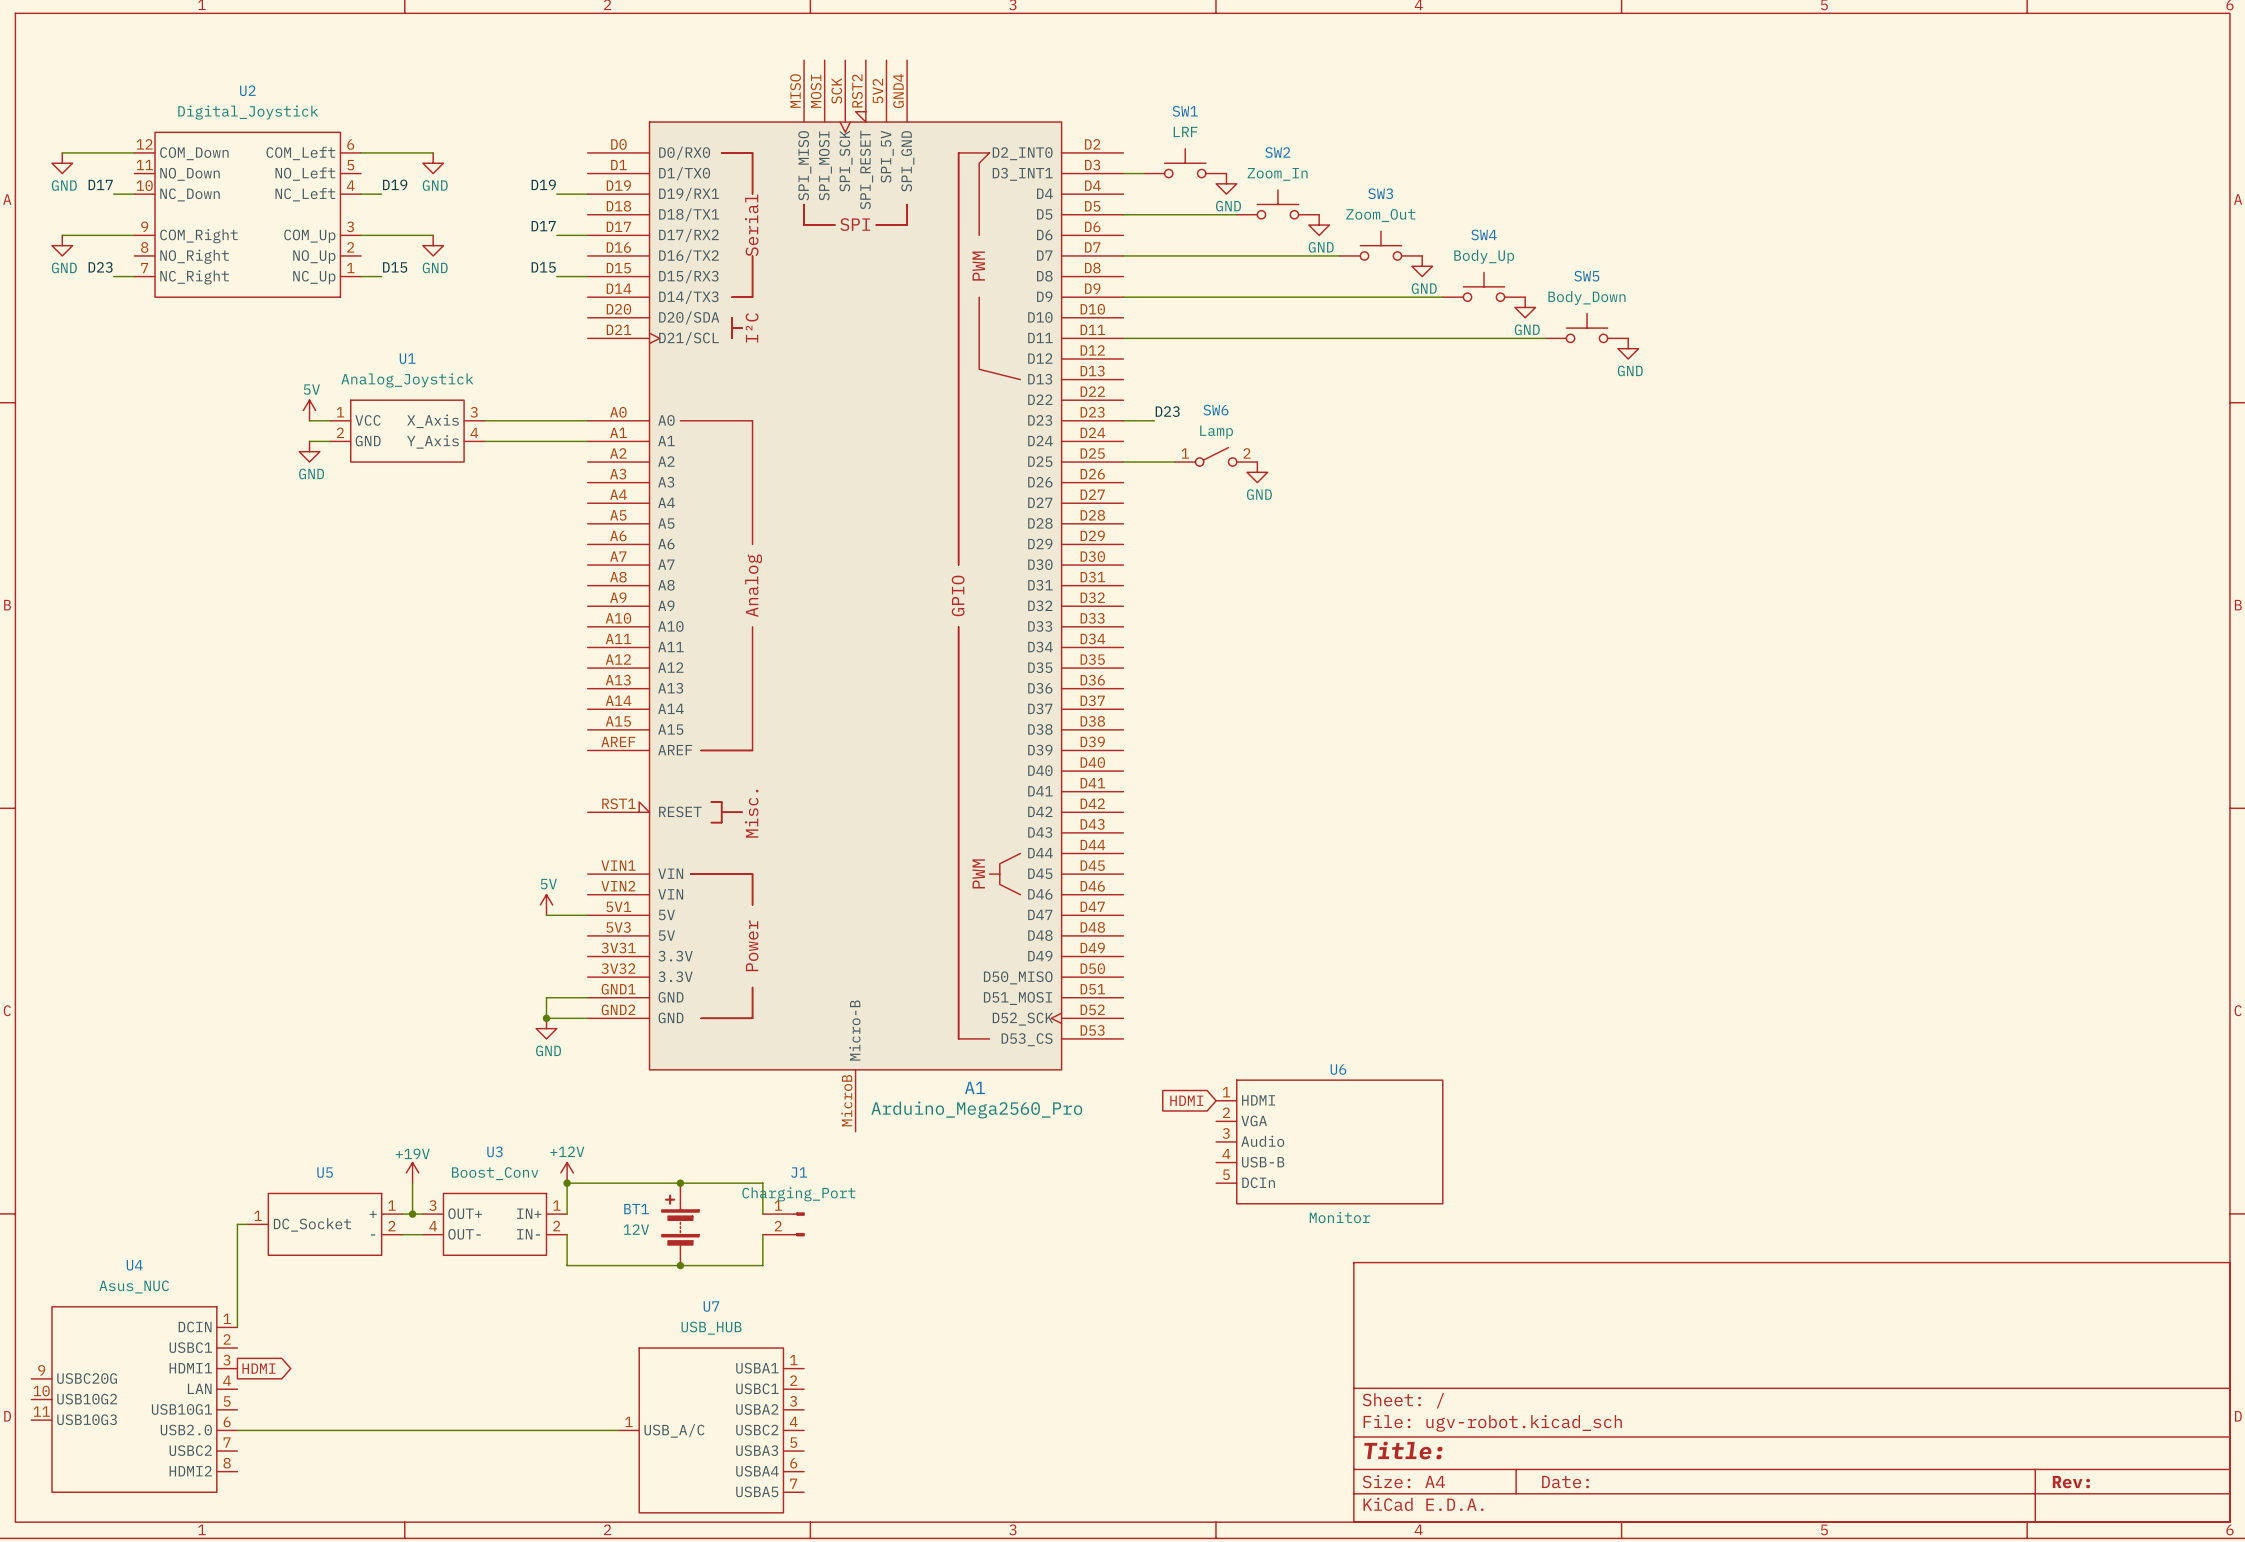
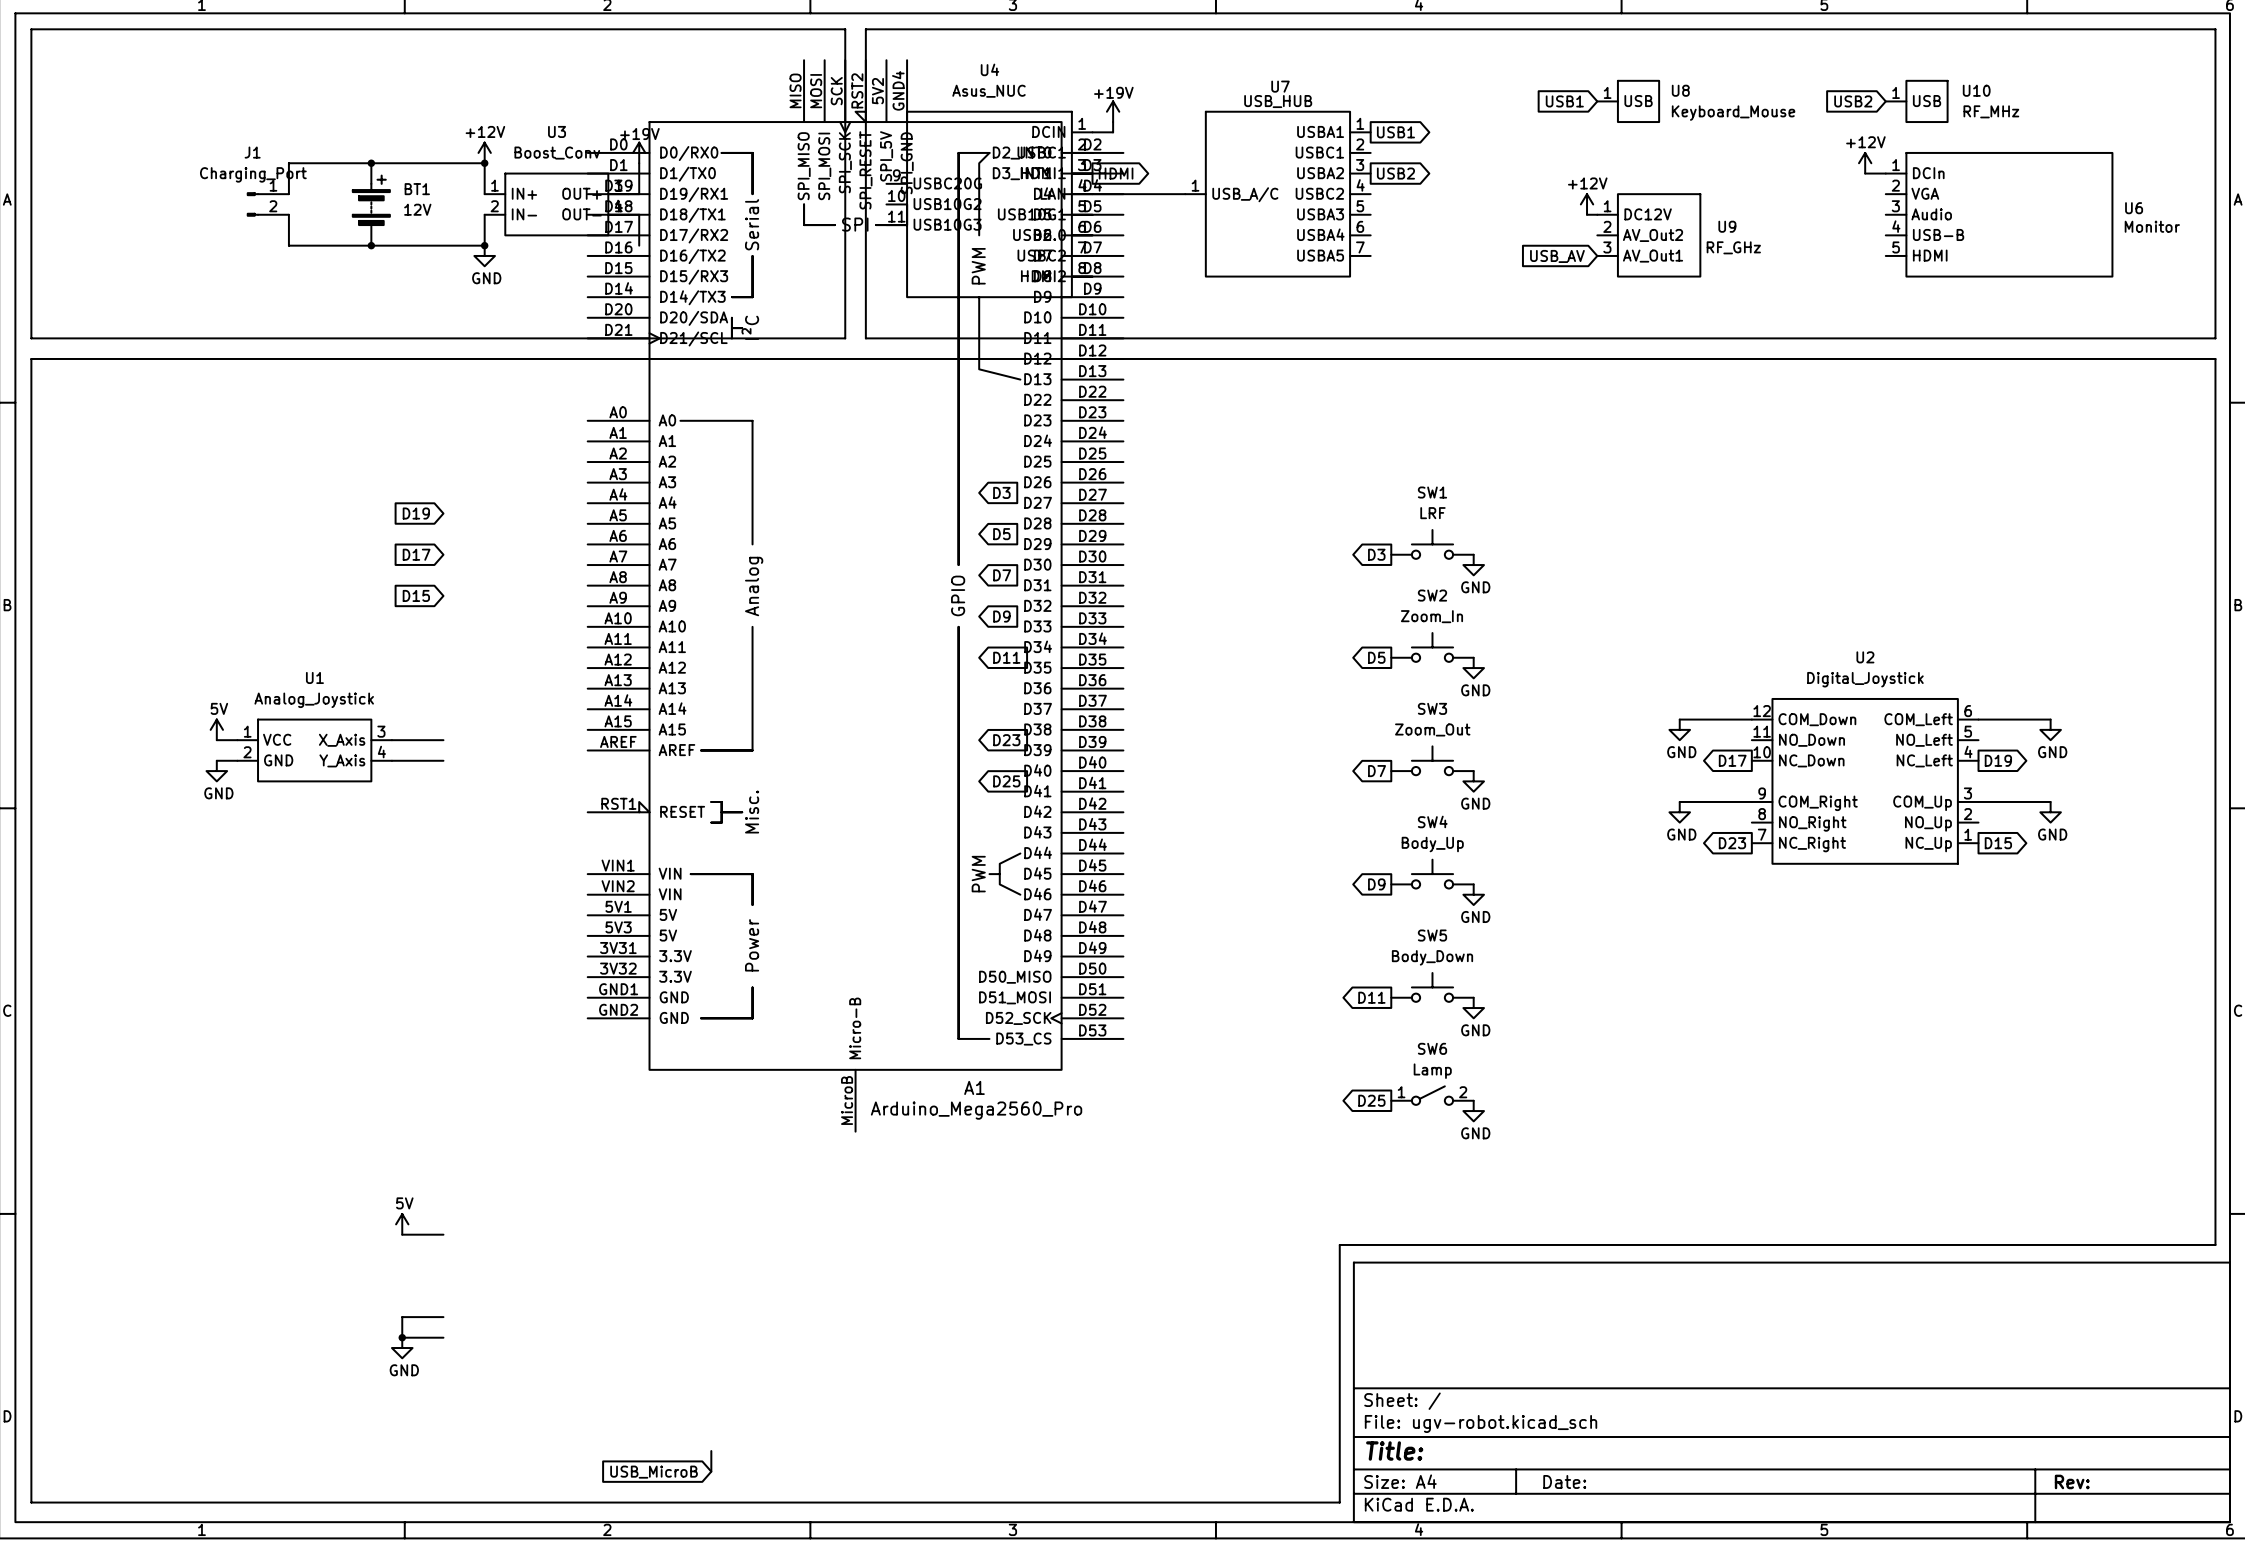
line: none -> (31, 29) (845, 29) (845, 338) (31, 338) (31, 29)
line: none -> (865, 29) (2215, 29) (2215, 338) (865, 338) (865, 29)
global label: none -> USB1 (1564, 101)
U8: none -> Keyboard_Mouse (1628, 101)
global label: none -> USB2 (1853, 101)
U10: none -> RF_MHz (1916, 101)
power symbol: none -> +19V (1113, 111)
wire: none -> (1113, 122) (1113, 132) (1092, 132)
global label: none -> USB1 (1395, 132)
wire: (62, 152) (134, 152) -> none
wire: (361, 152) (433, 152) -> none
power symbol: none -> +12V (484, 152)
power symbol: none -> +19V (639, 152)
power symbol: GND (62, 163) -> none
junction: none -> (371, 163)
power symbol: GND (433, 163) -> none
junction: none -> (484, 163)
wire: none -> (639, 163) (639, 194) (628, 194)
SW1 position: (1185, 163) -> (1432, 544)
power symbol: none -> +12V (1865, 163)
global label: none -> HDMI (1116, 173)
wire: (1123, 173) (1144, 173) -> none
global label: none -> USB2 (1395, 173)
wire: none -> (1865, 173) (1885, 173)
power symbol: GND (1226, 183) -> none
label: D17 (100, 184) -> none
label: D19 (395, 184) -> none
label: D19 (543, 184) -> none
wire: (113, 194) (134, 194) -> none
wire: none -> (288, 194) (288, 163) (484, 163) (484, 194)
wire: (361, 194) (381, 194) -> none
wire: (556, 194) (587, 194) -> none
wire: none -> (1092, 194) (1185, 194)
SW2 position: (1277, 204) -> (1432, 647)
power symbol: none -> +12V (1587, 204)
U2 position: (247, 214) -> (1865, 781)
wire: none -> (288, 214) (288, 245) (484, 245) (484, 214)
wire: none -> (628, 214) (639, 214) (639, 245)
wire: (1123, 214) (1236, 214) -> none
wire: none -> (1587, 214) (1597, 214)
power symbol: GND (1319, 225) -> none
label: D17 (543, 226) -> none
wire: (62, 235) (134, 235) -> none
wire: (361, 235) (433, 235) -> none
U9: none -> RF_GHz (1648, 235)
power symbol: GND (62, 245) -> none
junction: none -> (371, 245)
power symbol position: GND (433, 245) -> GND (484, 255)
junction: none -> (484, 245)
SW3 position: (1380, 245) -> (1432, 760)
wire: (1123, 255) (1339, 255) -> none
global label: none -> USB_AV (1557, 256)
power symbol: GND (1422, 266) -> none
label: D23 (100, 267) -> none
label: D15 (395, 267) -> none
label: D15 (543, 267) -> none
wire: (113, 276) (134, 276) -> none
wire: (361, 276) (381, 276) -> none
wire: (556, 276) (587, 276) -> none
SW4 position: (1484, 286) -> (1432, 874)
wire: (1123, 297) (1442, 297) -> none
power symbol: GND (1525, 307) -> none
SW5 position: (1587, 328) -> (1432, 987)
power symbol: GND (1628, 348) -> none
line: none -> (31, 358) (31, 1502) (1339, 1502) (1339, 1244) (2215, 1244) (2215, 358) (31, 358)
power symbol: 5V (309, 410) -> none
label: D23 (1167, 411) -> none
wire: (309, 420) (330, 420) -> none
wire: (484, 420) (587, 420) -> none
wire: (1123, 420) (1154, 420) -> none
U1 position: (407, 431) -> (314, 750)
wire: (309, 441) (330, 441) -> none
wire: (484, 441) (587, 441) -> none
power symbol: GND (309, 451) -> none
SW6 position: (1216, 456) -> (1432, 1095)
wire: (1123, 462) (1174, 462) -> none
power symbol: GND (1257, 472) -> none
global label: none -> D3 (1001, 492)
global label: none -> D19 (416, 513)
global label: none -> D5 (1001, 534)
global label: none -> D17 (416, 554)
global label: none -> D3 (1376, 554)
power symbol: none -> GND (1473, 565)
global label: none -> D7 (1002, 575)
global label: none -> D15 (416, 595)
global label: none -> D9 (1001, 616)
global label: none -> D11 (1006, 657)
global label: none -> D5 (1376, 657)
power symbol: none -> GND (1473, 668)
wire: none -> (1679, 719) (1751, 719)
wire: none -> (1978, 719) (2050, 719)
power symbol: none -> 5V (216, 729)
power symbol: none -> GND (1679, 729)
power symbol: none -> GND (2050, 729)
wire: none -> (216, 740) (237, 740)
wire: none -> (391, 740) (443, 740)
global label: none -> D23 (1006, 740)
wire: none -> (216, 760) (237, 760)
wire: none -> (391, 760) (443, 760)
global label: none -> D17 (1732, 760)
global label: none -> D19 (1998, 760)
power symbol: none -> GND (216, 771)
global label: none -> D7 (1377, 771)
global label: none -> D25 (1006, 781)
power symbol: none -> GND (1473, 781)
wire: none -> (1679, 801) (1751, 801)
wire: none -> (1978, 801) (2050, 801)
power symbol: none -> GND (1679, 812)
power symbol: none -> GND (2050, 812)
global label: none -> D23 (1732, 843)
global label: none -> D15 (1998, 843)
global label: none -> D9 (1376, 884)
power symbol: none -> GND (1473, 894)
power symbol: 5V (546, 905) -> none
wire: (546, 915) (587, 915) -> none
wire: (587, 997) (546, 997) (546, 1018) (587, 1018) -> none
global label: none -> D11 (1371, 997)
power symbol: none -> GND (1473, 1008)
junction: (546, 1018) -> none
power symbol: GND (546, 1028) -> none
U6 name position: U6 (1338, 1069) -> U6 (2134, 208)
global label: HDMI (1186, 1100) -> none
U6 pin name: HDMI (1258, 1100) -> DCIn (1928, 173)
global label: none -> D25 (1371, 1100)
power symbol: none -> GND (1473, 1111)
U6 position: (1329, 1141) -> (1999, 214)
power symbol: +19V (412, 1172) -> none
power symbol: +12V (567, 1172) -> none
U6 pin name: DCIn (1258, 1182) -> HDMI (1930, 255)
wire: (412, 1183) (412, 1214) -> none
junction: (567, 1183) -> none
junction: (680, 1183) -> none
junction: (412, 1214) -> none
wire: (567, 1214) (567, 1183) (762, 1183) (762, 1214) -> none
U6 value position: Monitor (1339, 1217) -> Monitor (2152, 226)
BT1 flip: as is (680, 1219) -> left-right (371, 199)
wire: (247, 1224) (237, 1224) (237, 1327) -> none
U5: (324, 1224) -> none
power symbol: none -> 5V (402, 1224)
U3 flip: as is (494, 1224) -> left-right (556, 204)
U3 position: (494, 1224) -> (556, 204)
BT1 position: (680, 1224) -> (371, 204)
J1 position: (783, 1224) -> (268, 204)
J1 flip: as is (798, 1224) -> left-right (252, 204)
wire: (567, 1234) (567, 1265) (762, 1265) (762, 1234) -> none
junction: (680, 1265) -> none
U7 name position: U7 (711, 1306) -> U7 (1280, 86)
wire: none -> (443, 1317) (402, 1317) (402, 1337) (443, 1337)
U7 value position: USB_HUB (711, 1328) -> USB_HUB (1278, 101)
junction: none -> (402, 1337)
power symbol: none -> GND (402, 1348)
global label: HDMI (258, 1368) -> none
U4 position: (134, 1399) -> (989, 204)
wire: (237, 1430) (618, 1430) -> none
U7 position: (711, 1430) -> (1277, 194)
wire: none -> (711, 1451) (711, 1471)
global label: none -> USB_MicroB (654, 1472)

